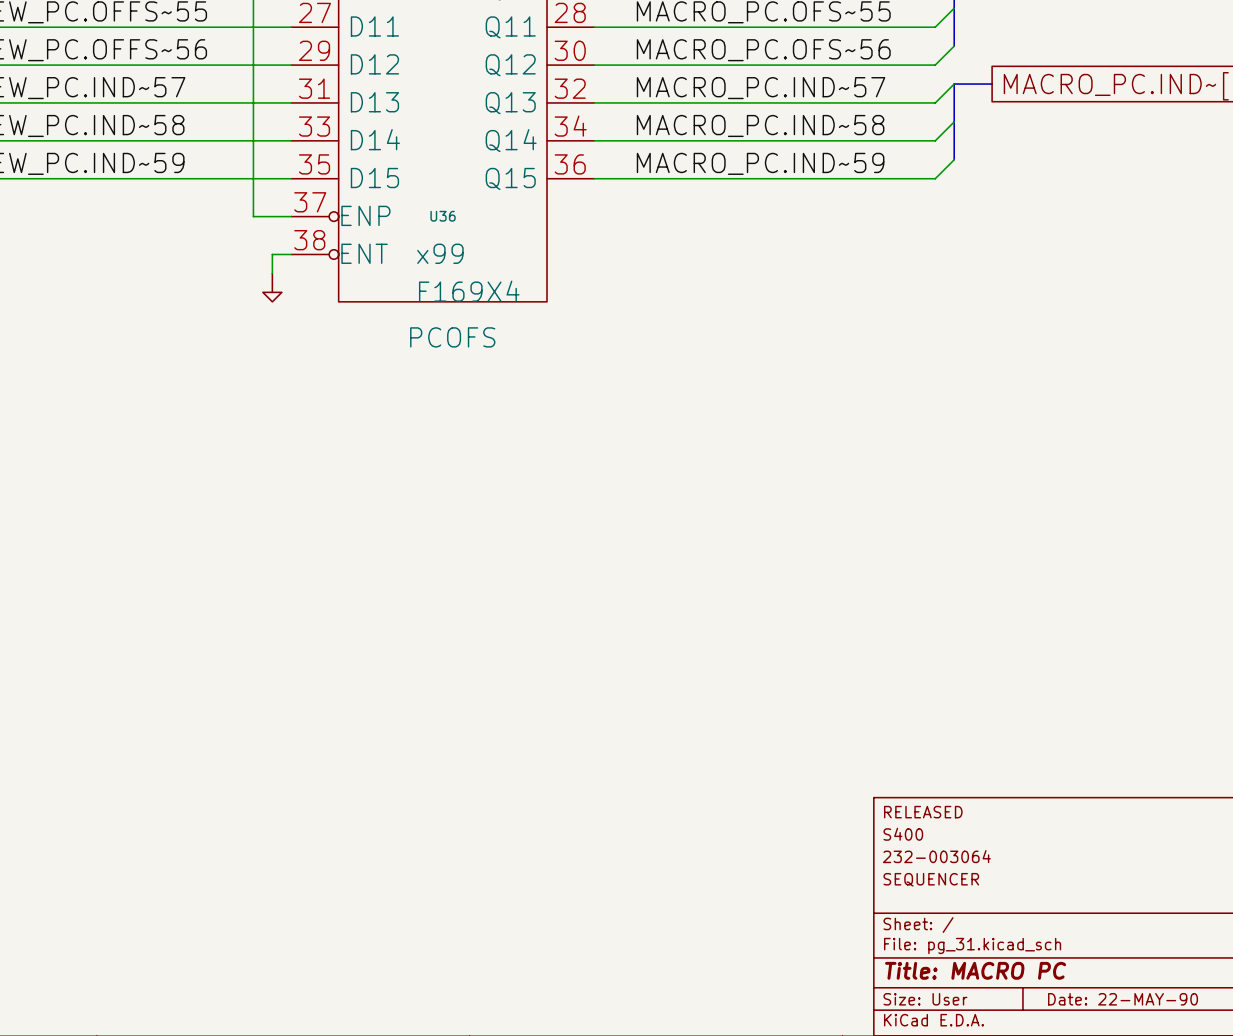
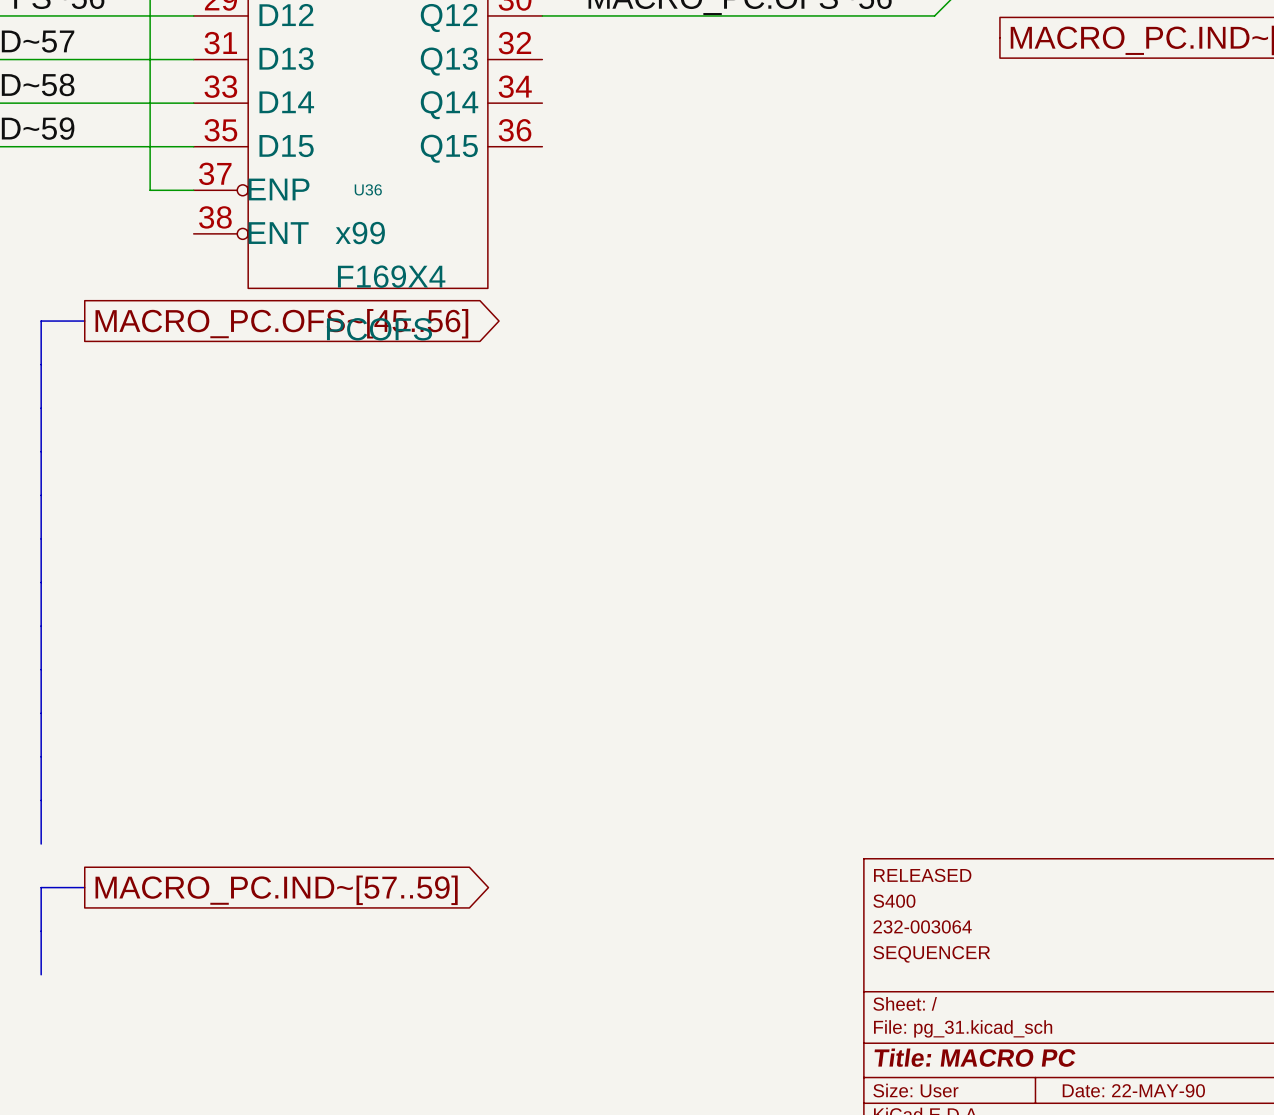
wire: (954, 84) (935, 102) (594, 102) -> none
bus: (992, 84) (954, 84) (954, 159) -> none
label: MACRO_PC.IND~57 (761, 88) -> none
wire: (954, 121) (935, 140) (594, 140) -> none
label: MACRO_PC.IND~58 (760, 125) -> none
wire: (954, 159) (935, 178) (594, 178) -> none
label: MACRO_PC.IND~59 (760, 163) -> none
wire: (291, 254) (272, 254) (272, 273) -> none
power symbol: (272, 287) -> none
bus: none -> (84, 321) (41, 321) (41, 844)
global label: none -> MACRO_PC.OFS~[45..56] (281, 323)
bus: none -> (84, 887) (41, 887) (41, 974)
global label: none -> MACRO_PC.IND~[57..59] (276, 890)

